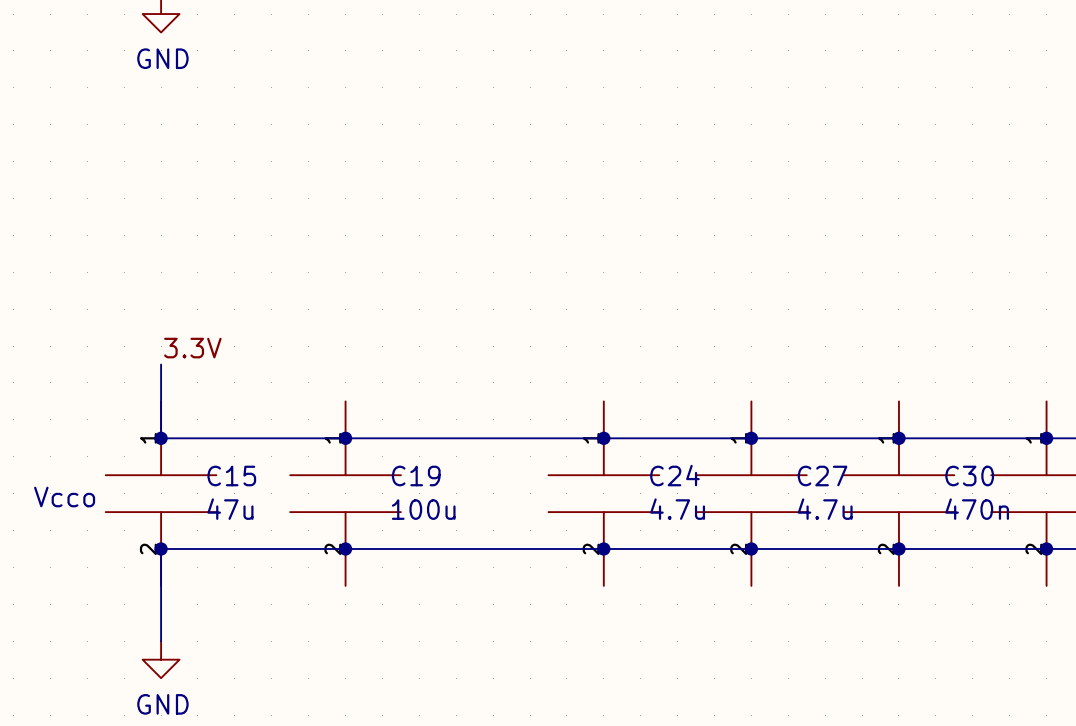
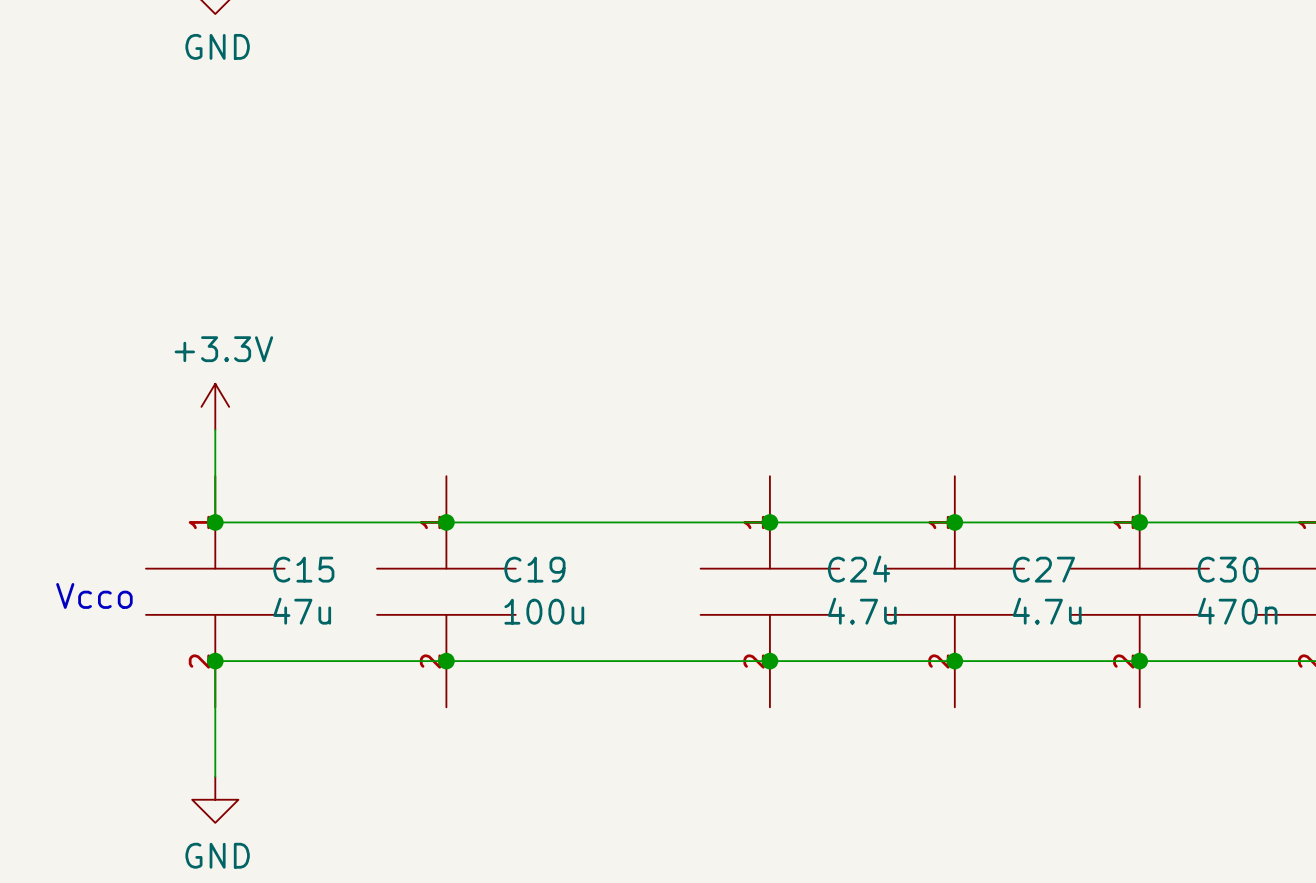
power symbol: none -> +3.3V (215, 406)
label: 3.3V (192, 348) -> none

